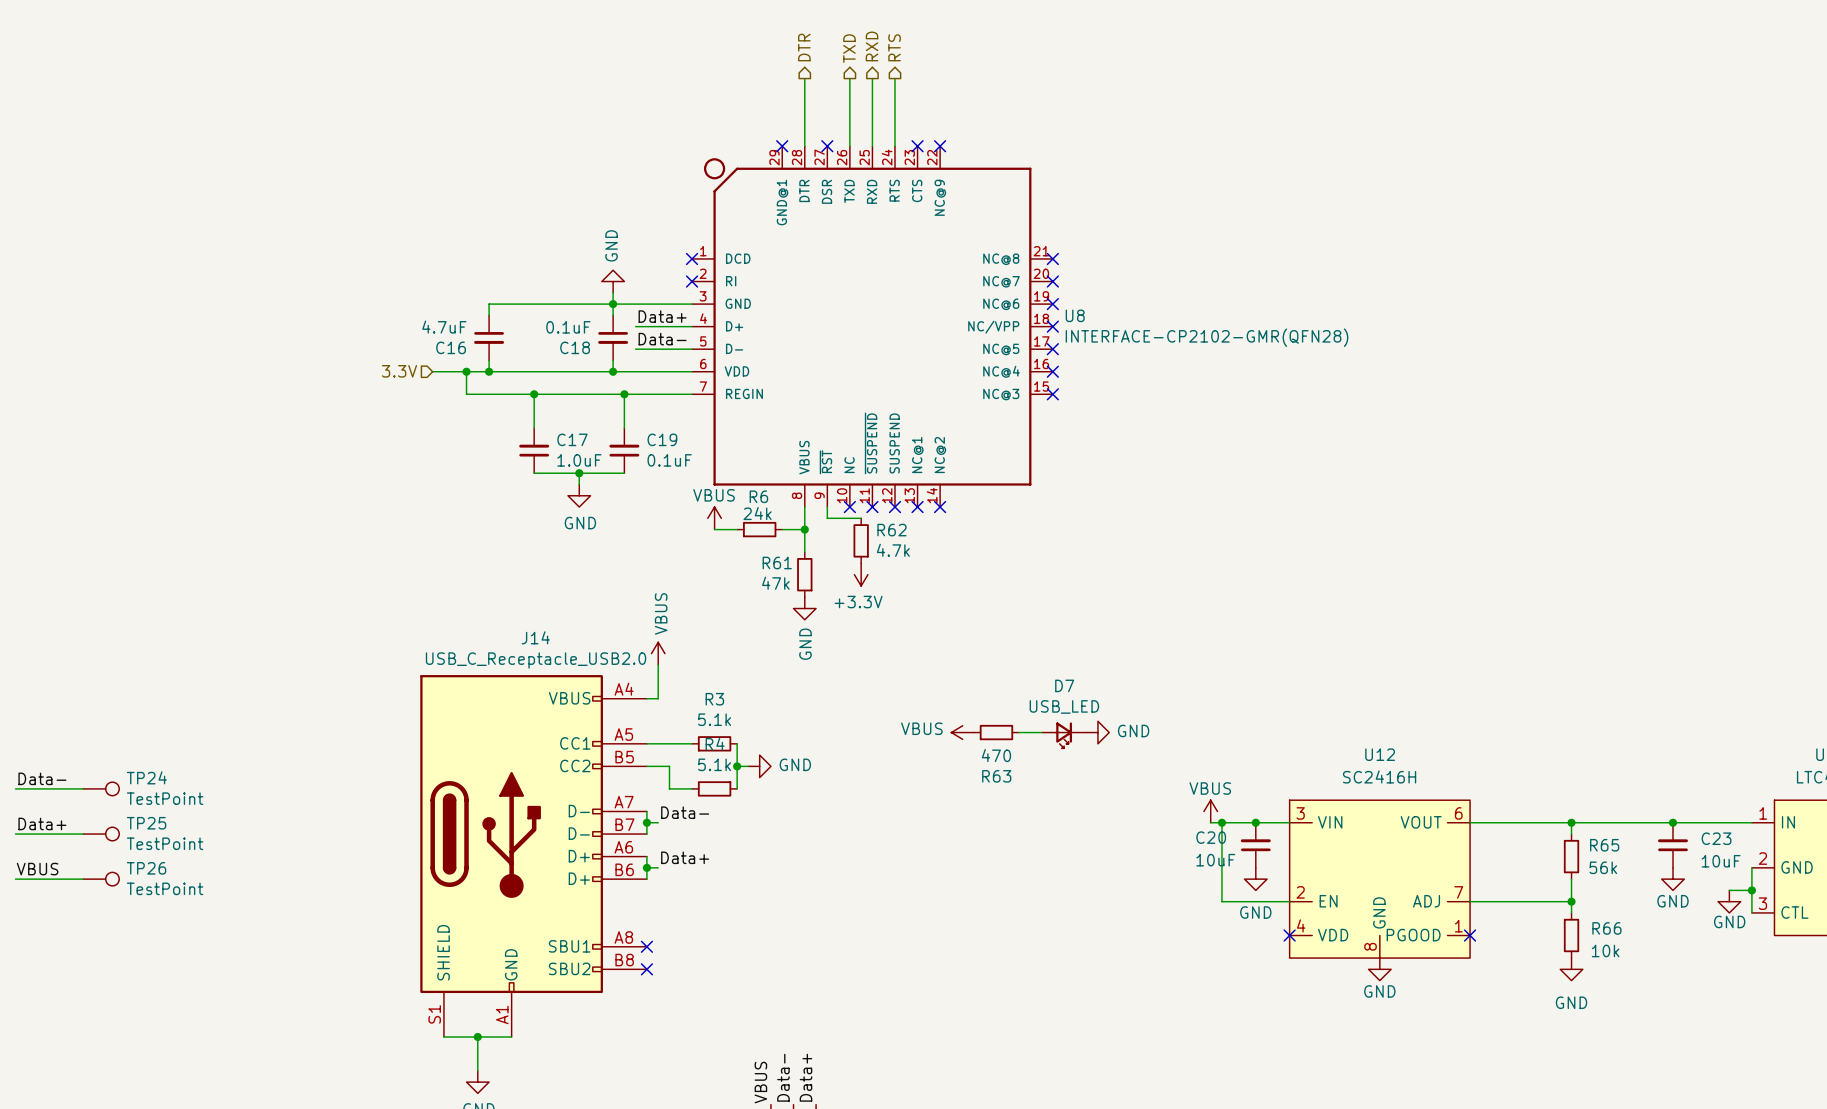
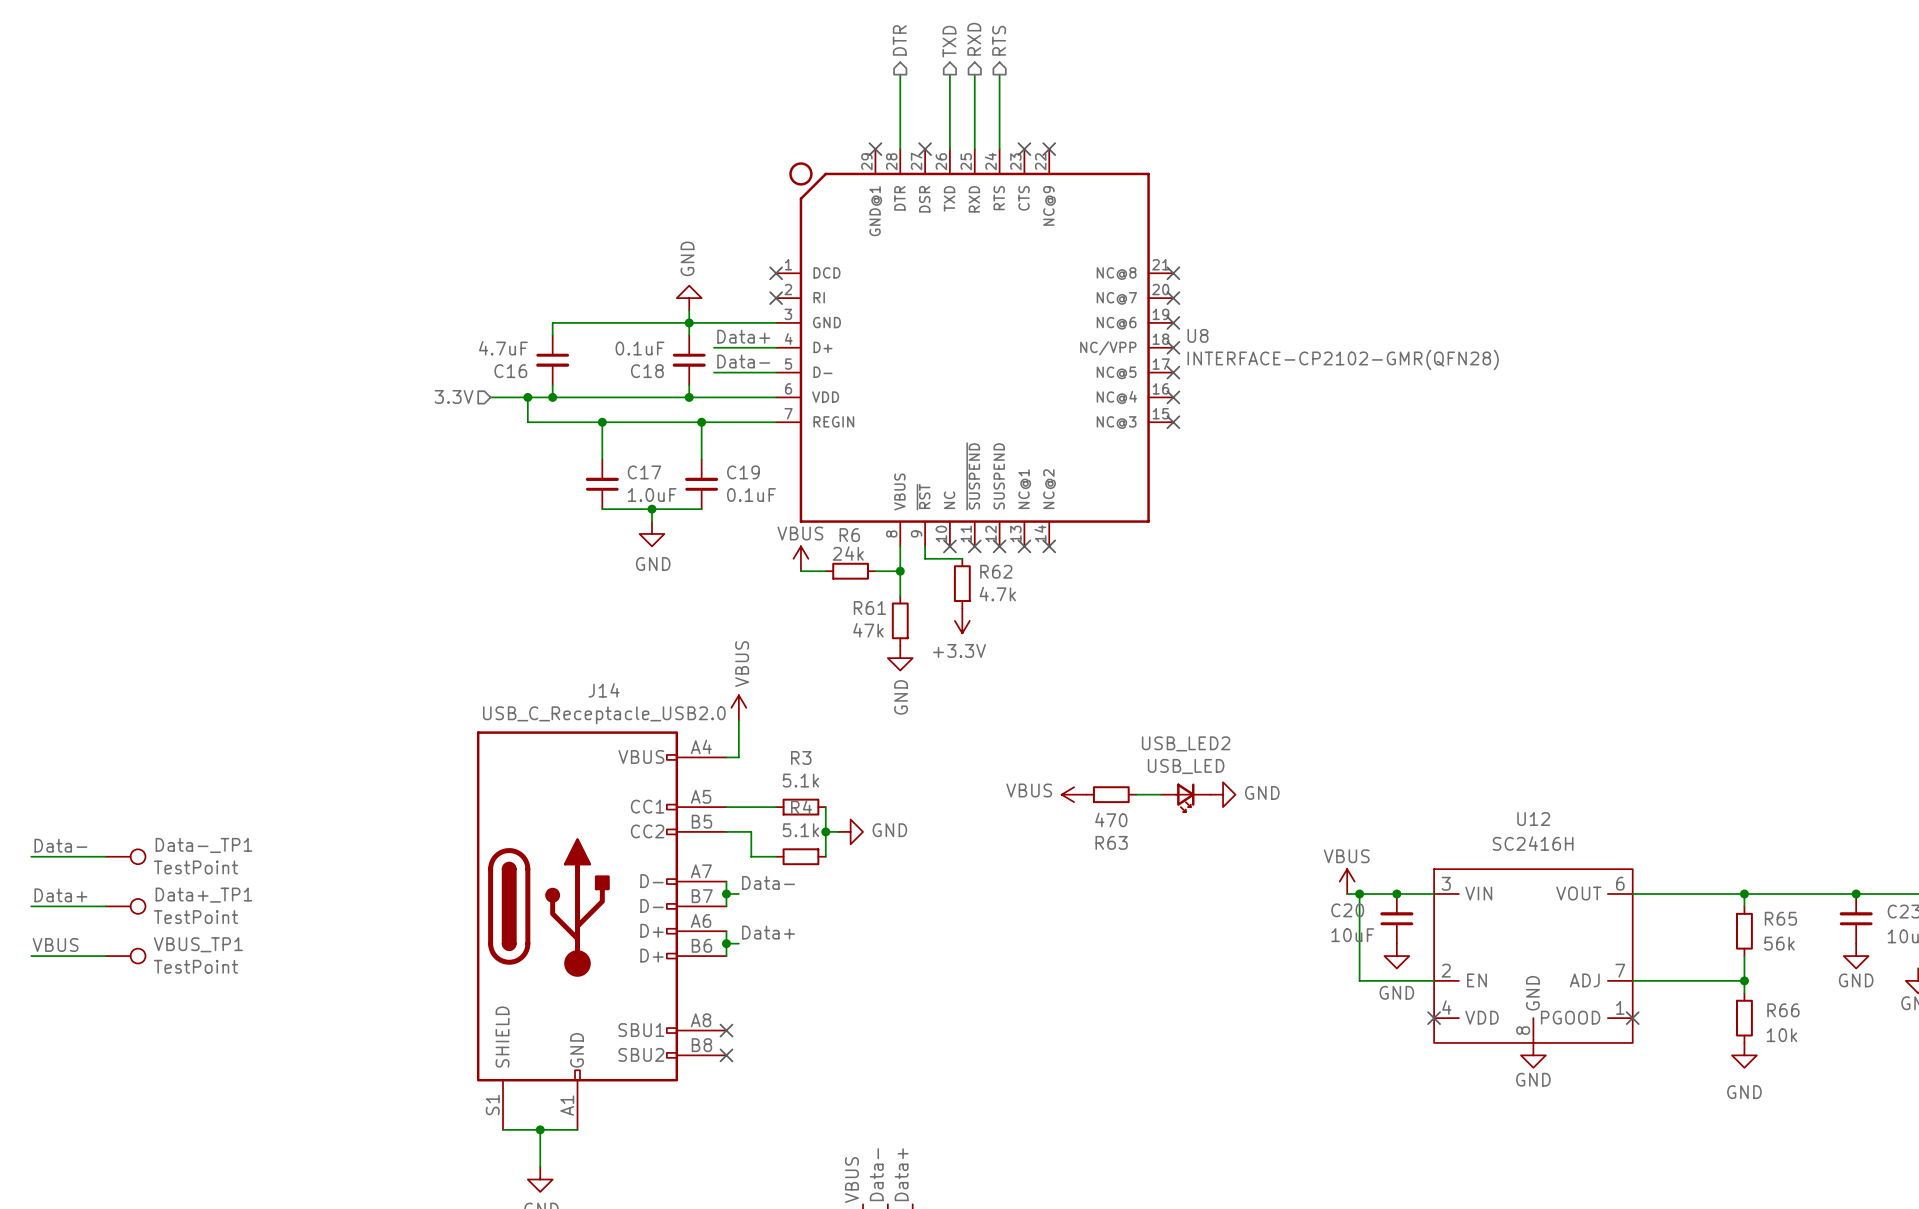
D7 name: D7 (1064, 685) -> USB_LED2 (1186, 743)
TP24 name: TP24 (146, 777) -> Data-_TP1 (203, 845)
TP25 name: TP25 (146, 823) -> Data+_TP1 (203, 895)
TP26 name: TP26 (146, 868) -> VBUS_TP1 (198, 944)

